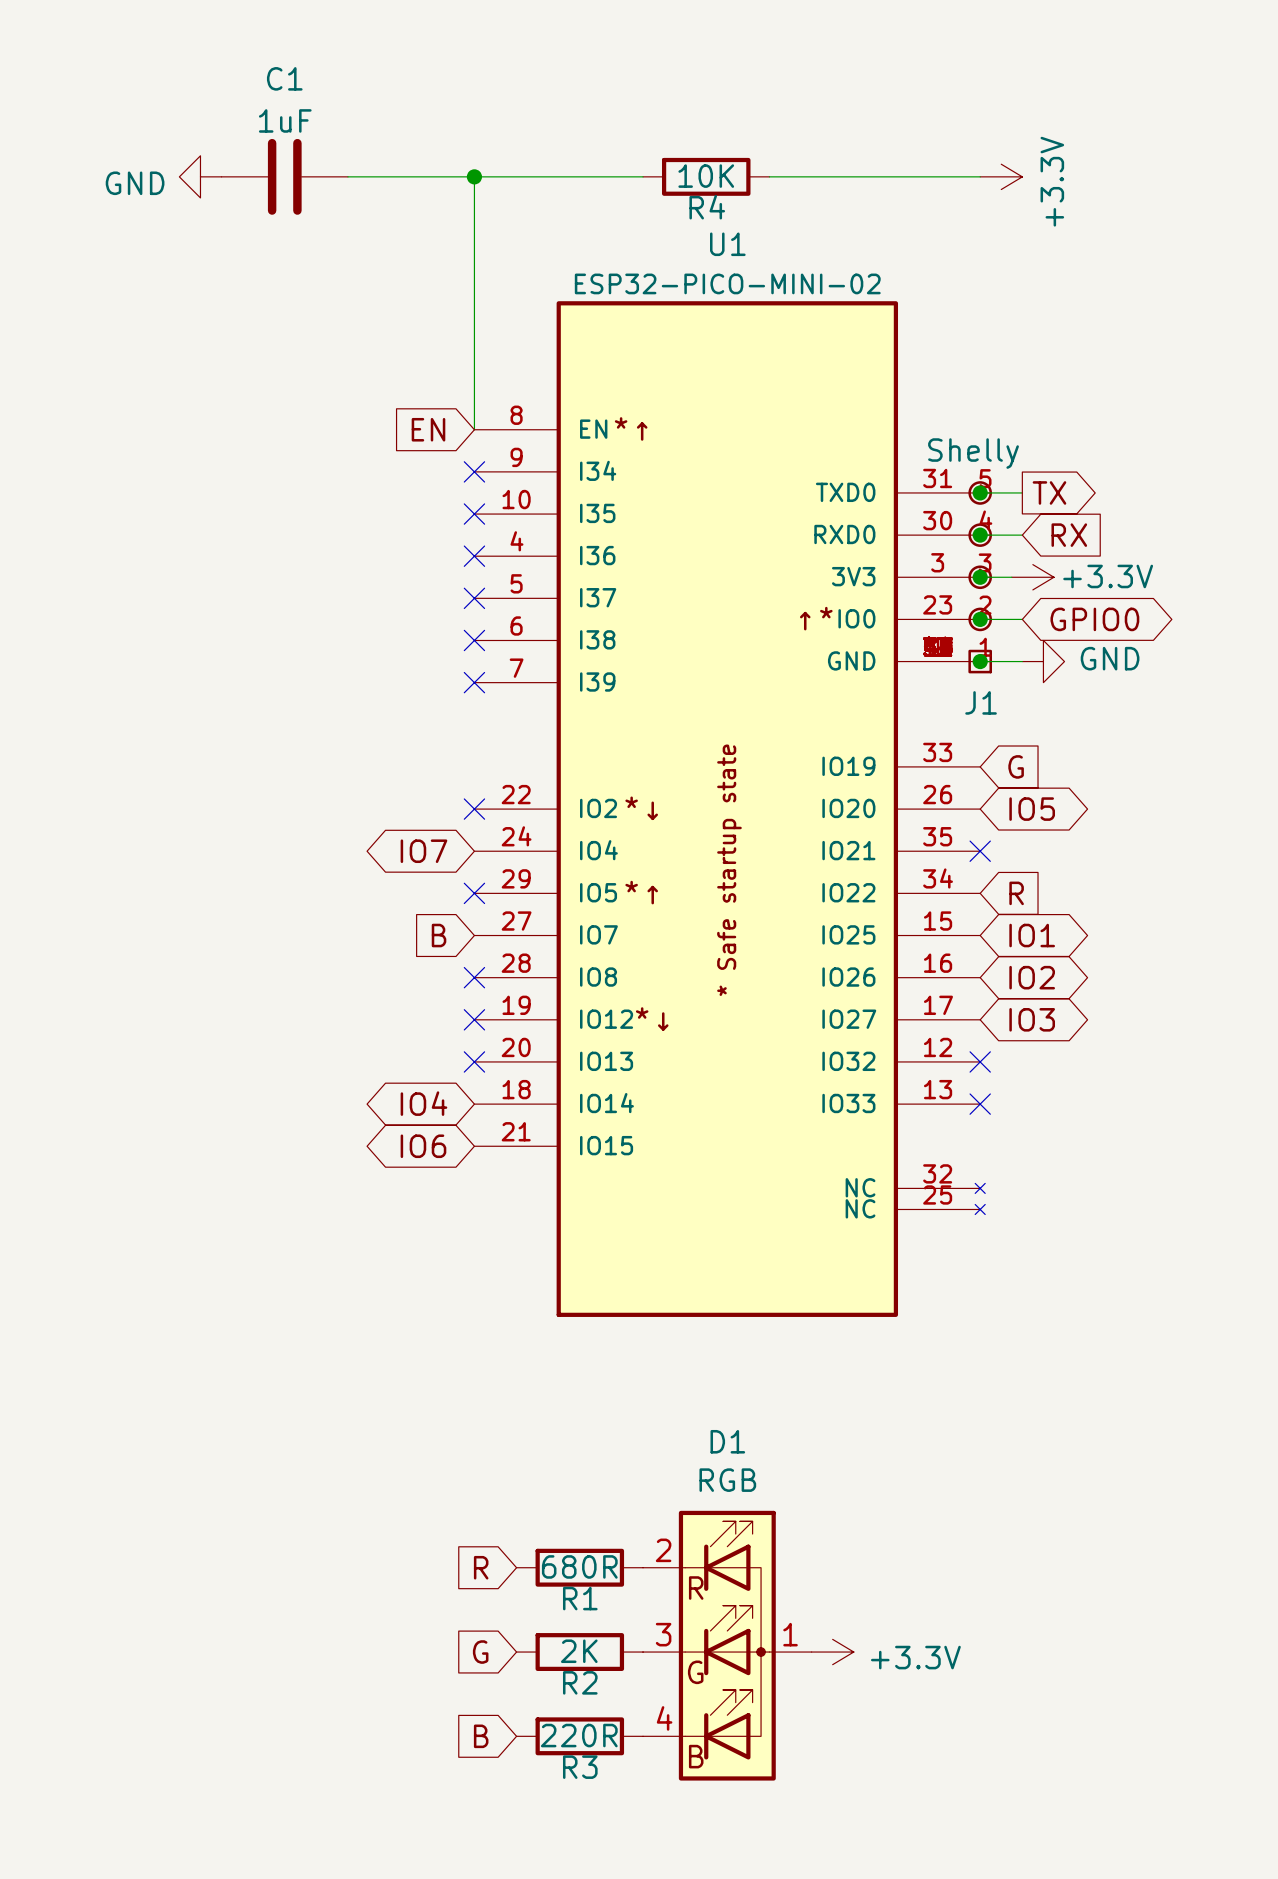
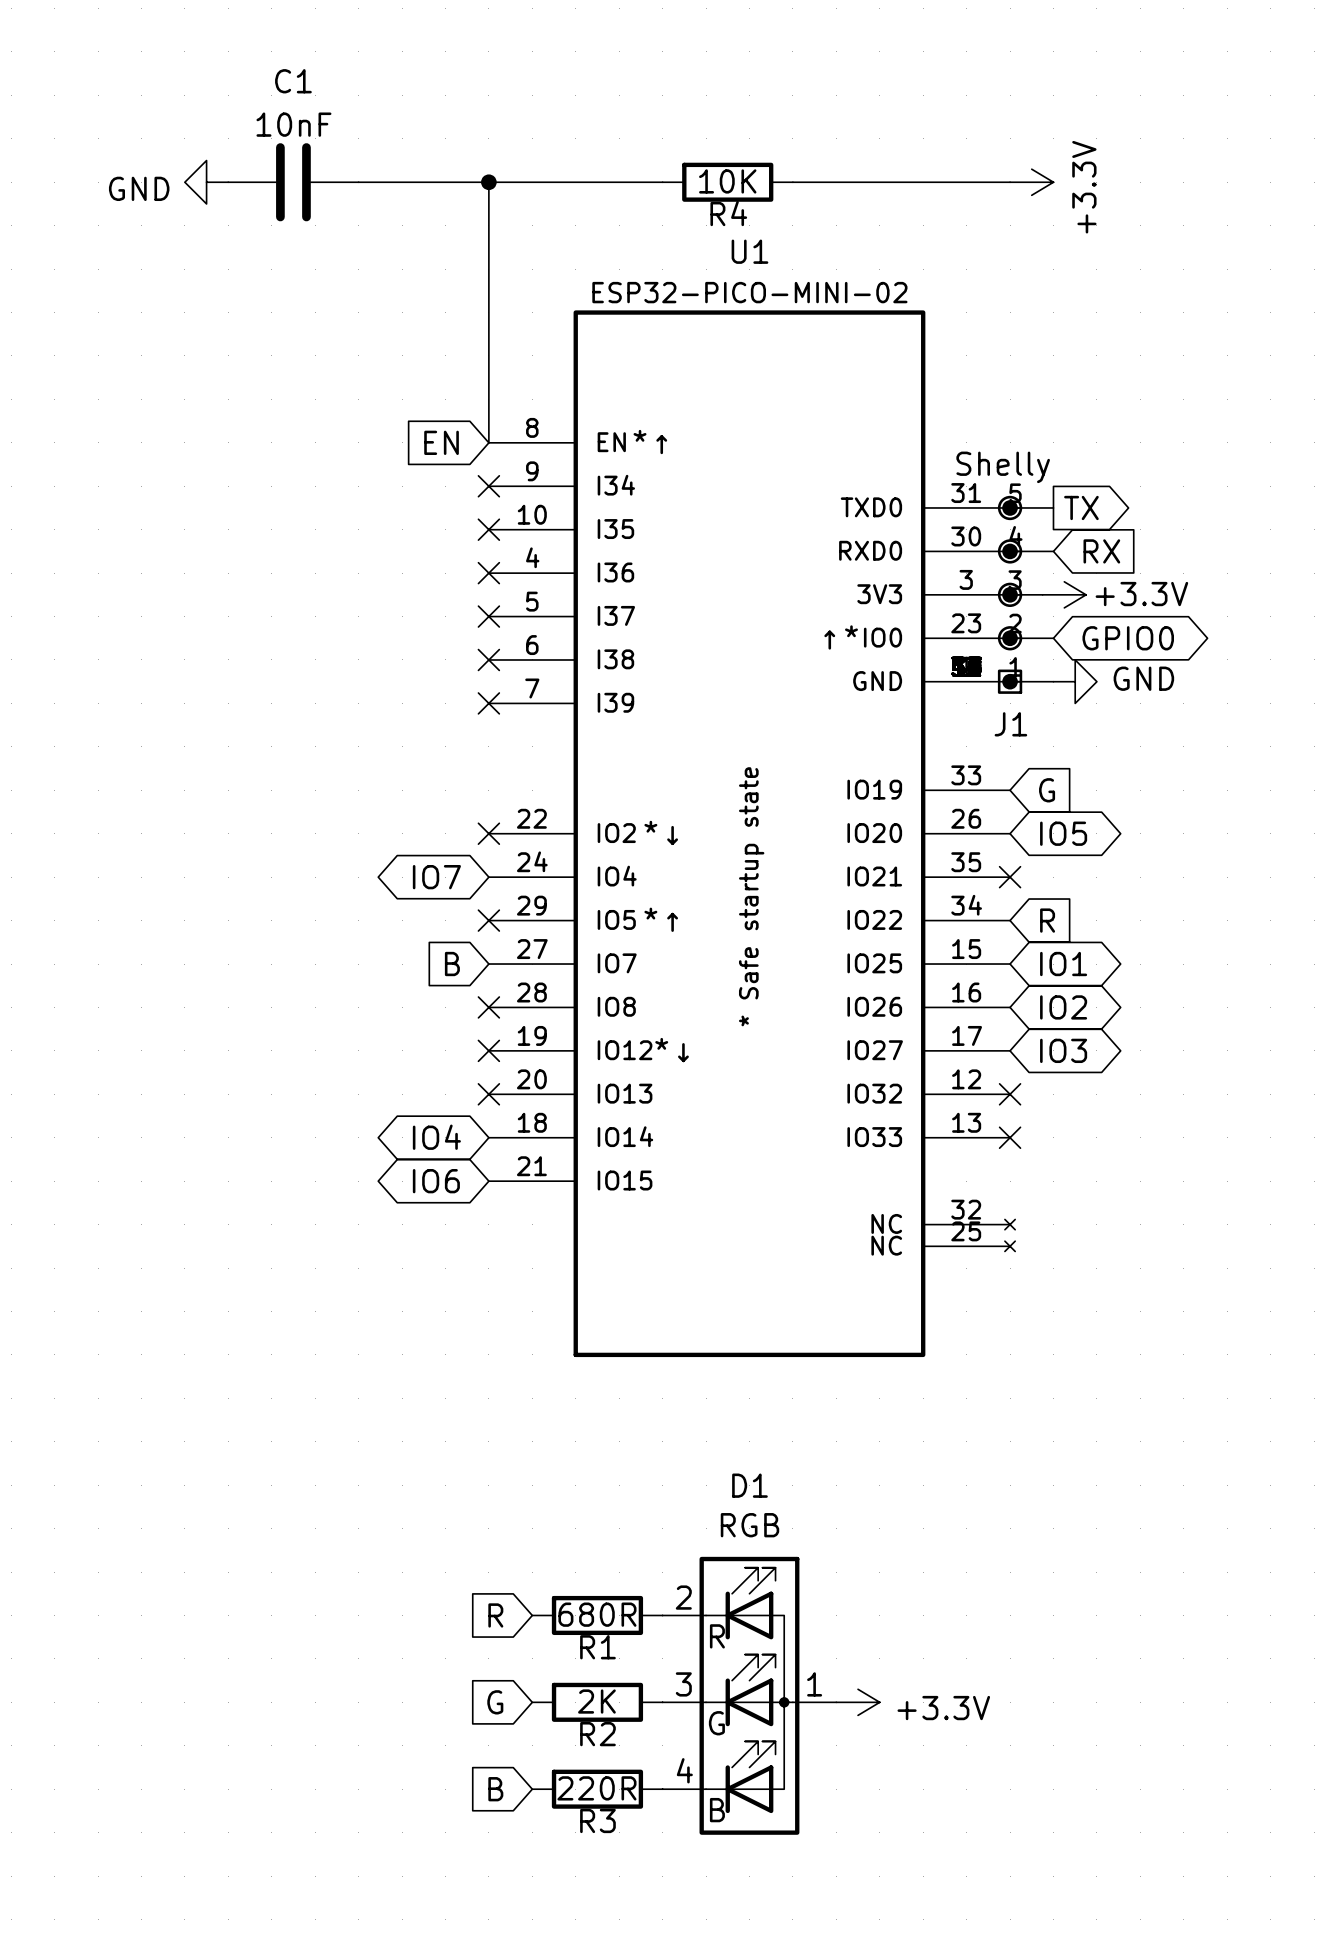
C1 value: 1uF (285, 120) -> 10nF (293, 124)

